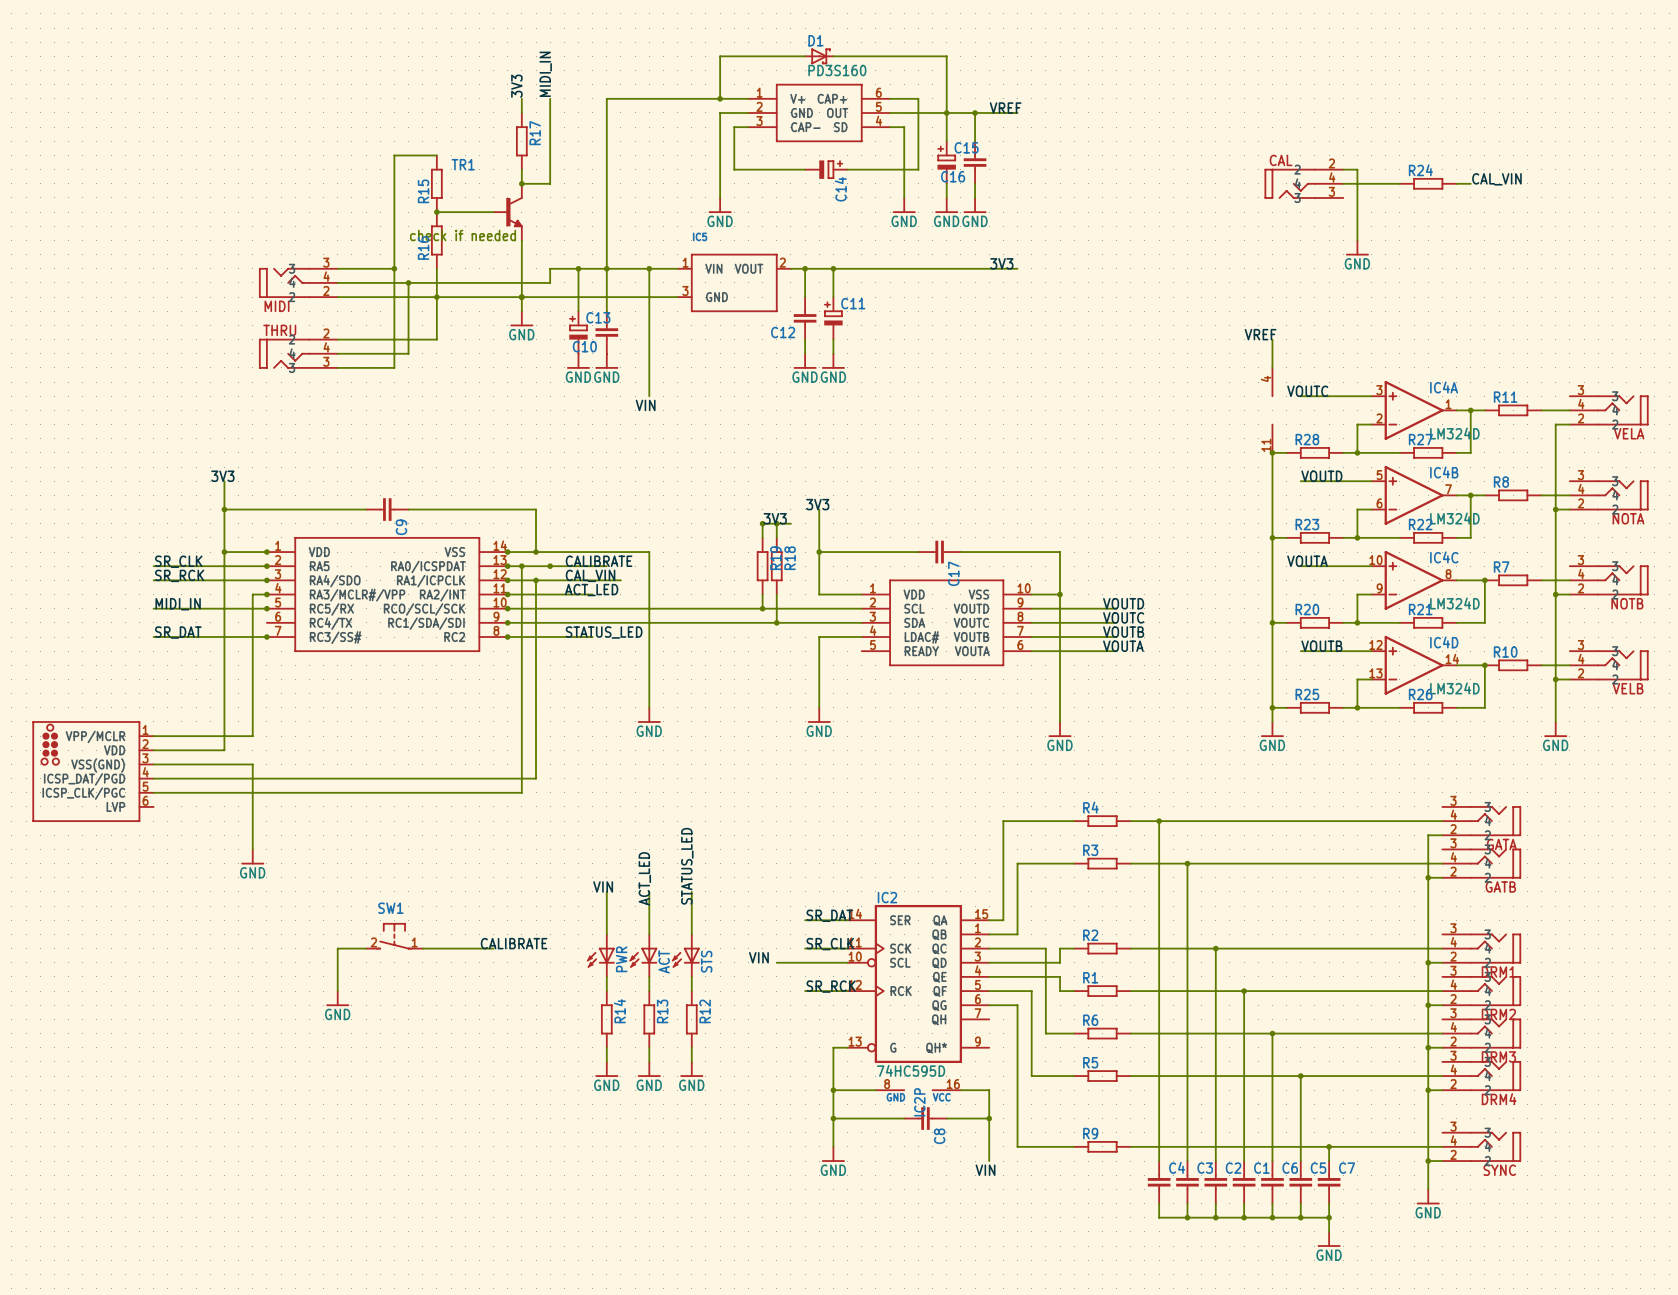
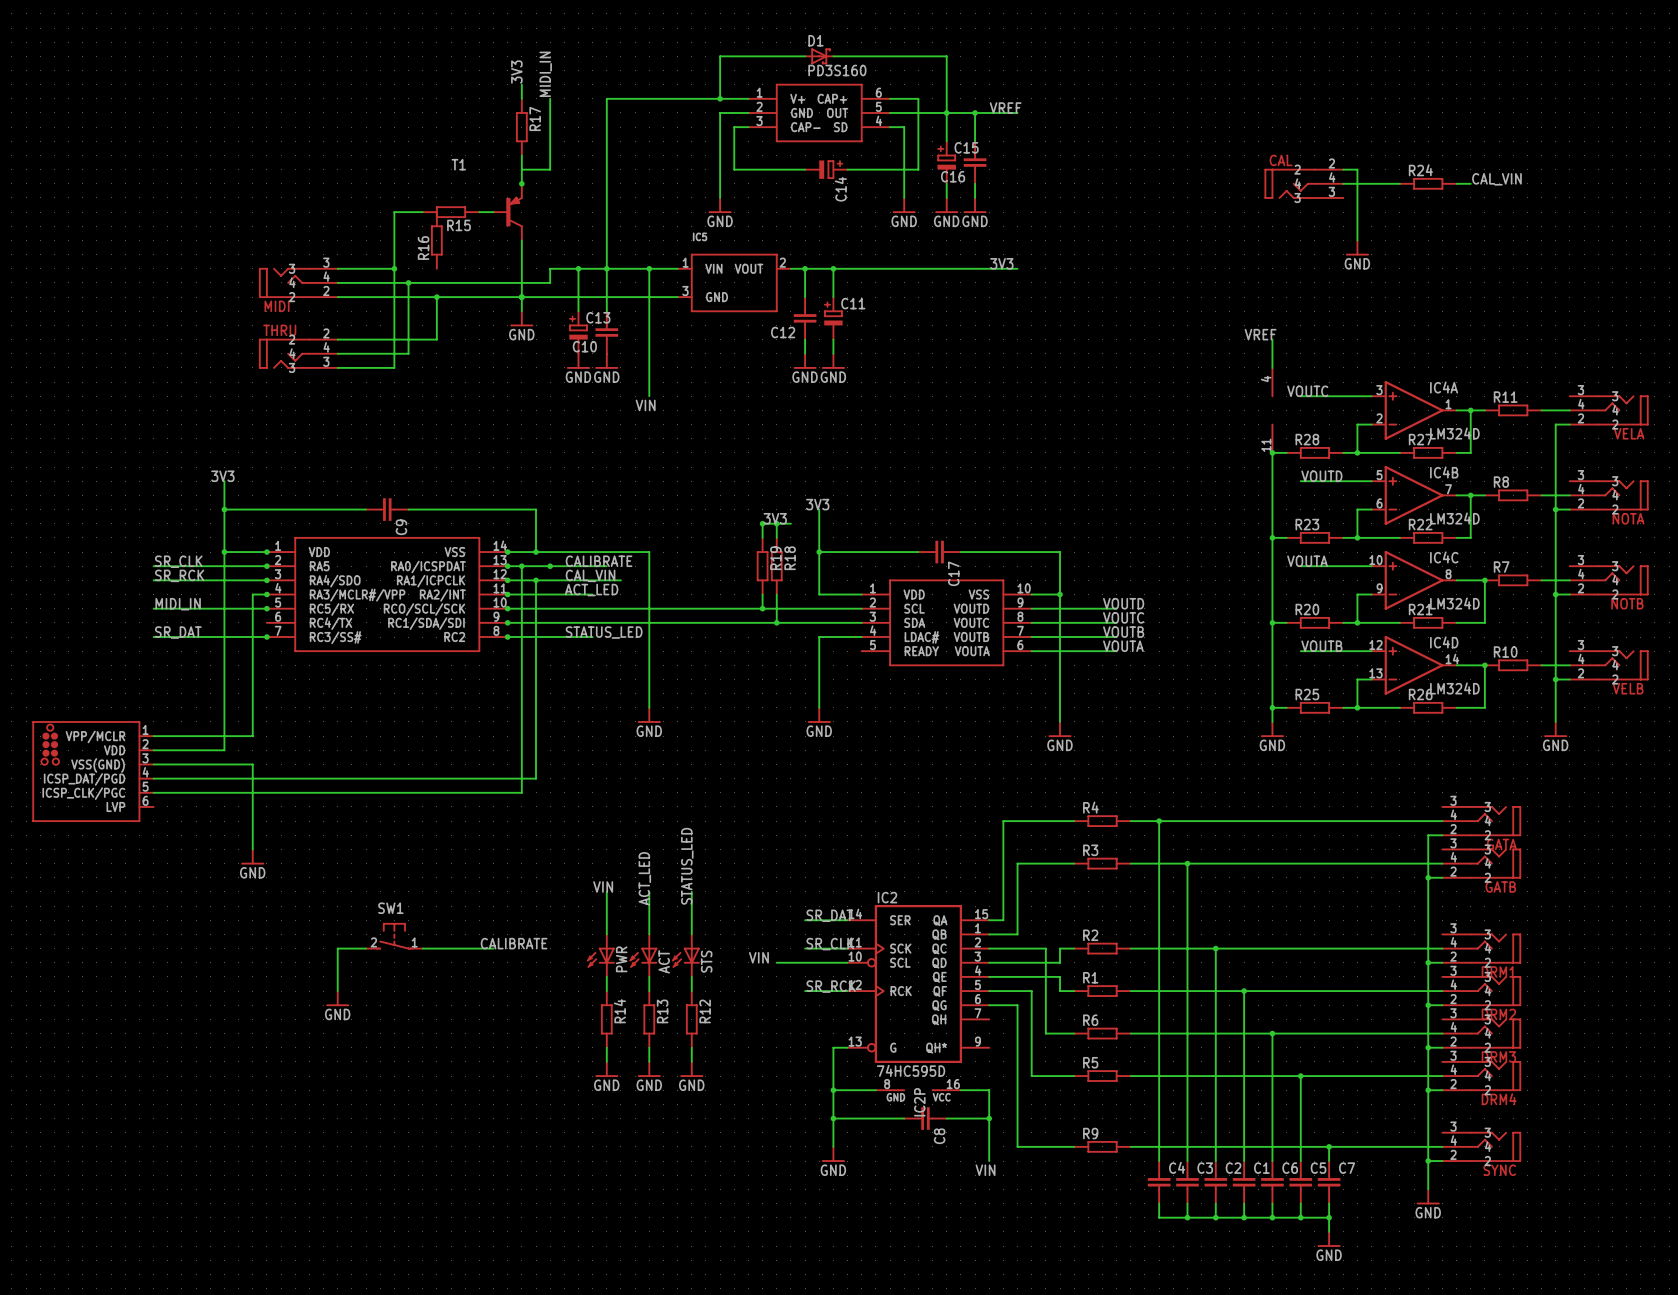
label position: 3V3 (516, 86) -> 3V3 (516, 72)
R17 position: (521, 141) -> (521, 127)
wire: (436, 155) (394, 155) (394, 212) -> (422, 212) (394, 212)
wire: (550, 169) (550, 183) (521, 183) -> (550, 169) (521, 169) (521, 155)
R15 rotation: 0° (436, 183) -> 90° clockwise (451, 212)
R15 name position: R15 (423, 191) -> R15 (459, 225)
wire: (436, 212) (479, 212) -> none
junction: (436, 212) -> none
TR1: (507, 212) -> none
T1: none -> (507, 212)
text: check if needed (463, 235) -> none
wire: (436, 268) (436, 297) -> none

